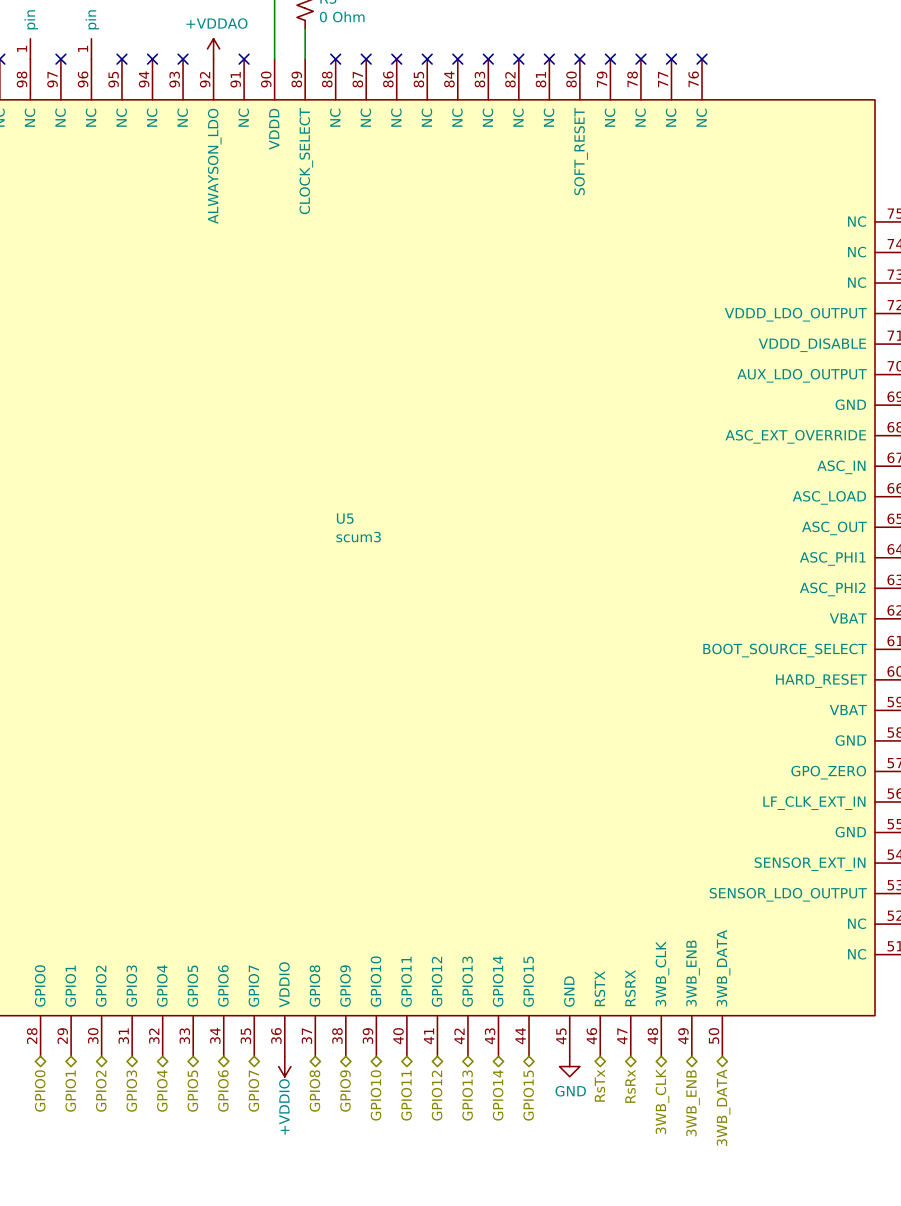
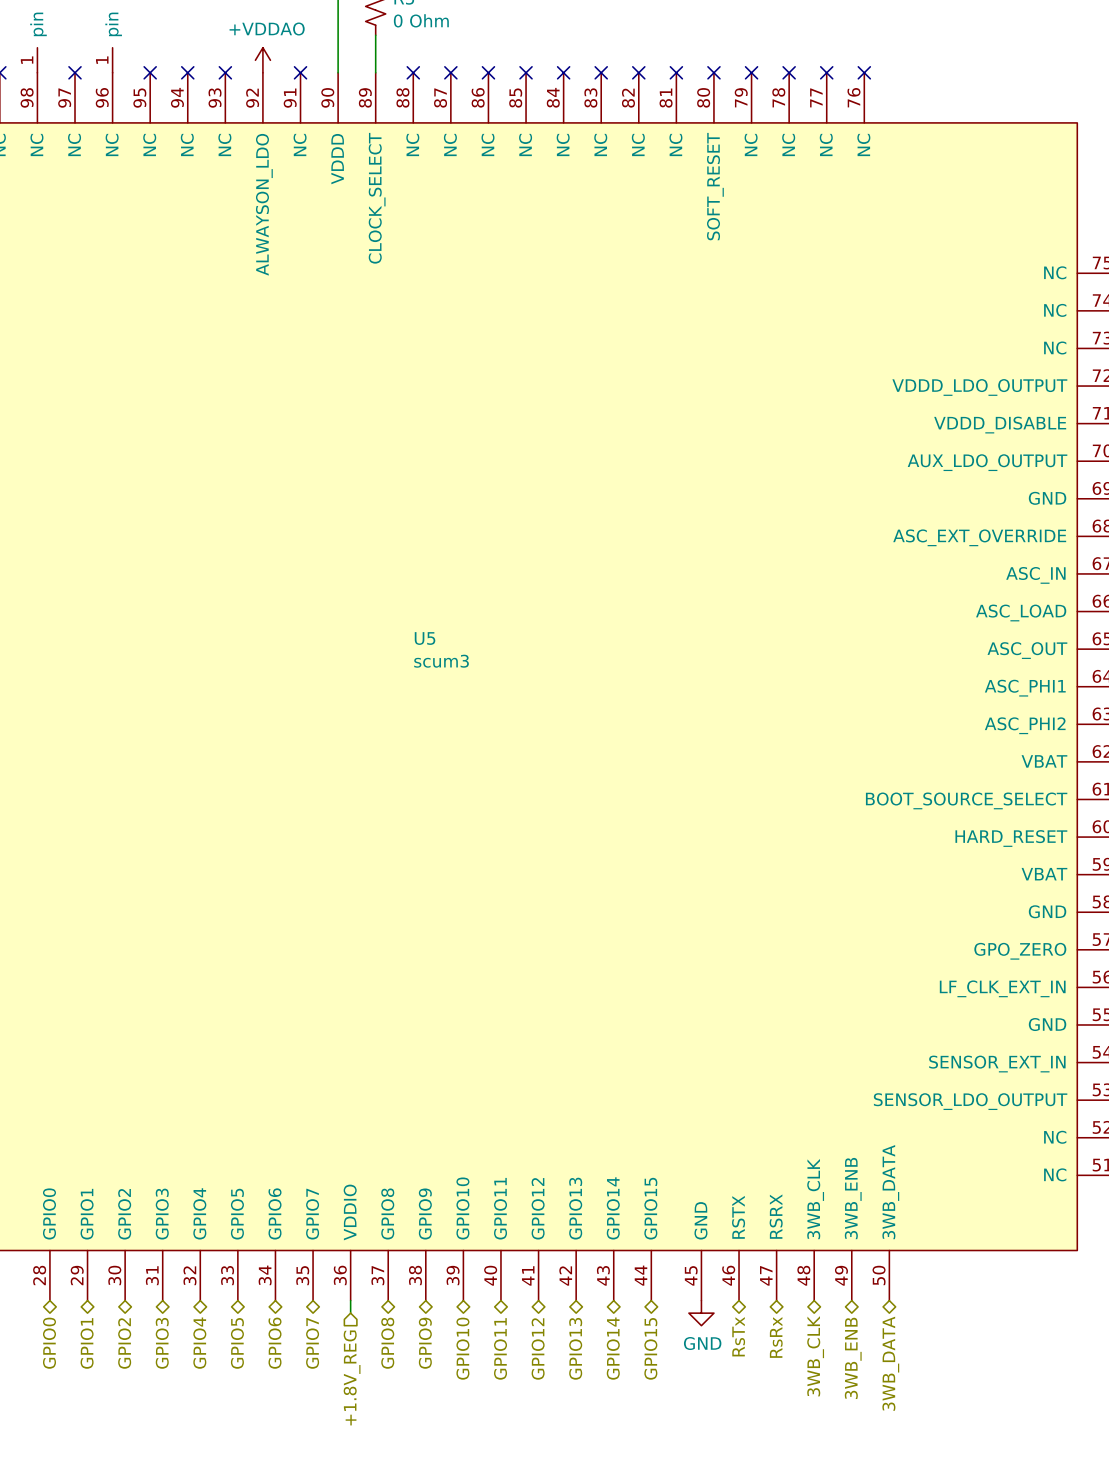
power symbol: +VDDIO (284, 1066) -> none
hierarchical label: none -> +1.8V_REG (352, 1377)

